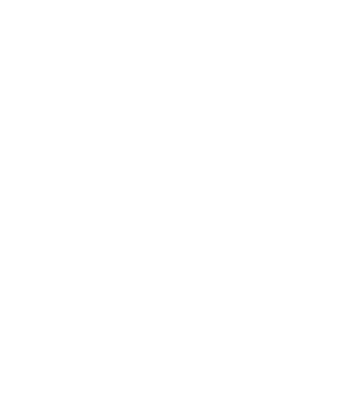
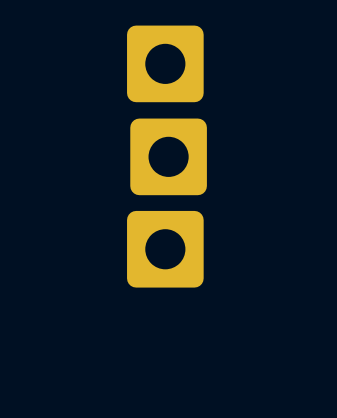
part: none -> (165, 63)
part: none -> (168, 156)
part: none -> (165, 249)

